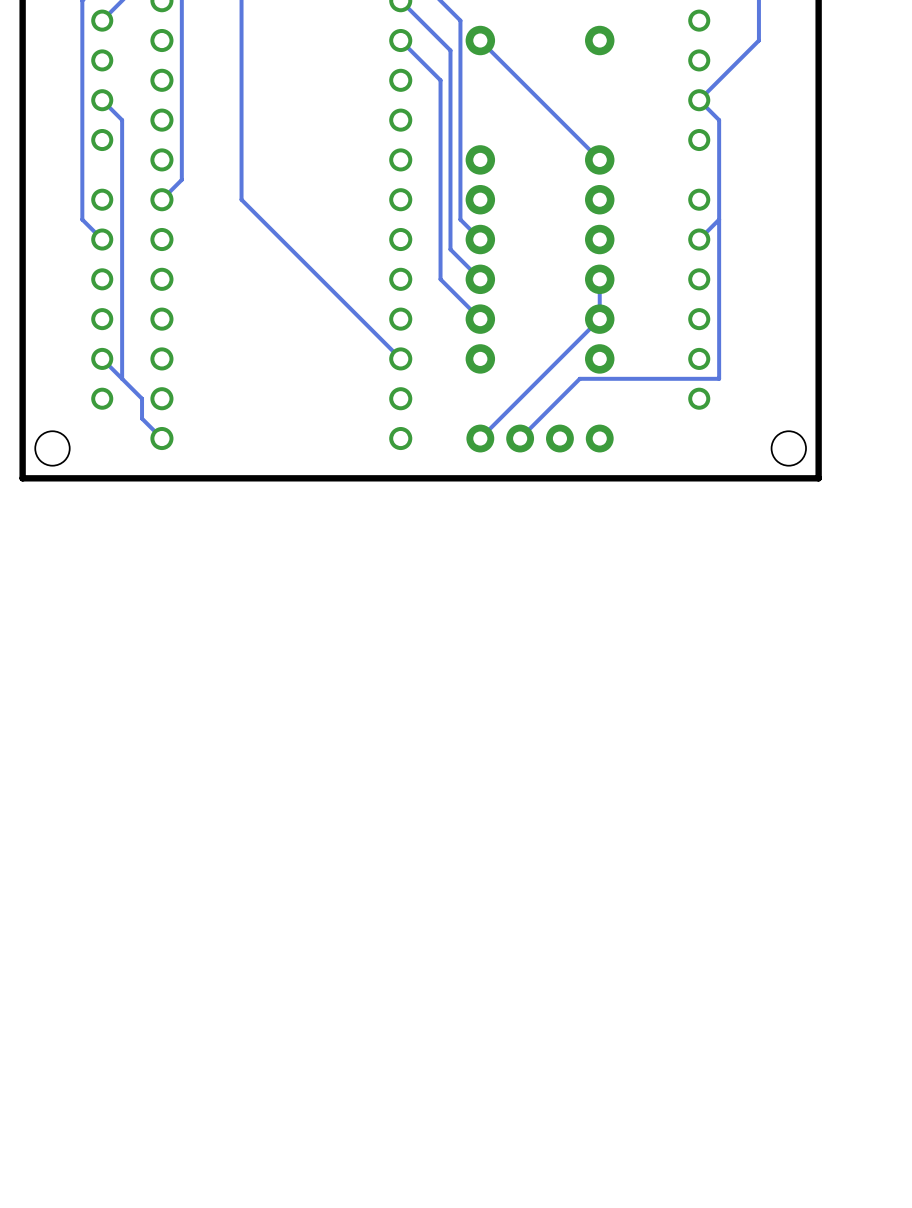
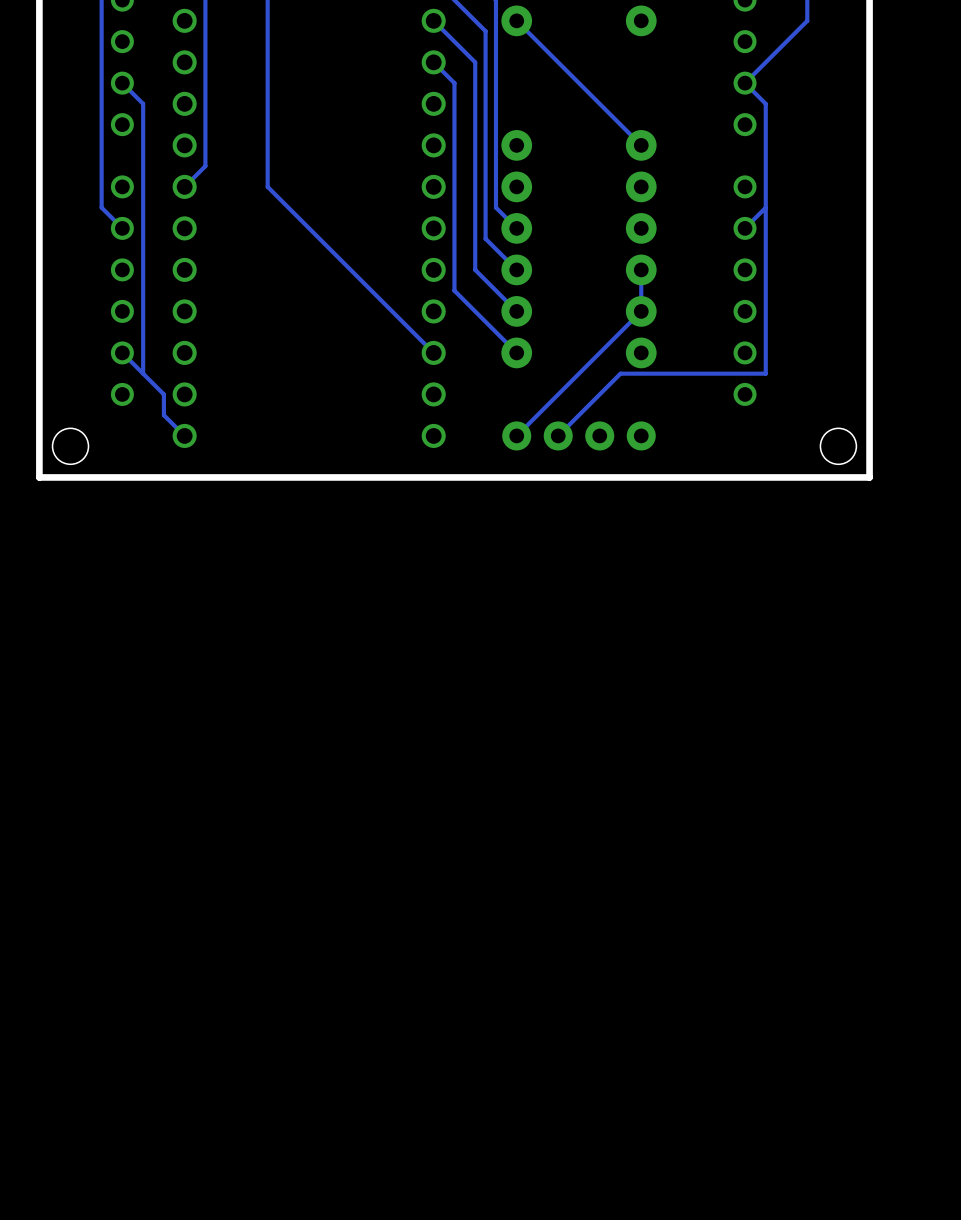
track: none -> (433, 62) (454, 83) (454, 290) (516, 352)

